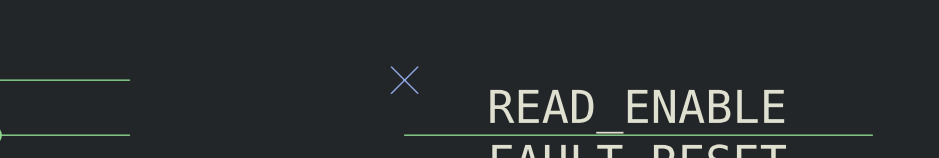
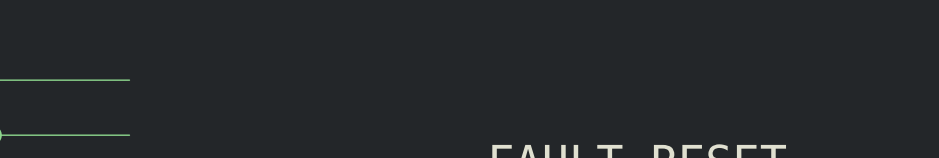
no-connect mark: (404, 80) -> none
label: READ_ENABLE (637, 111) -> none
wire: (404, 135) (872, 135) -> none

